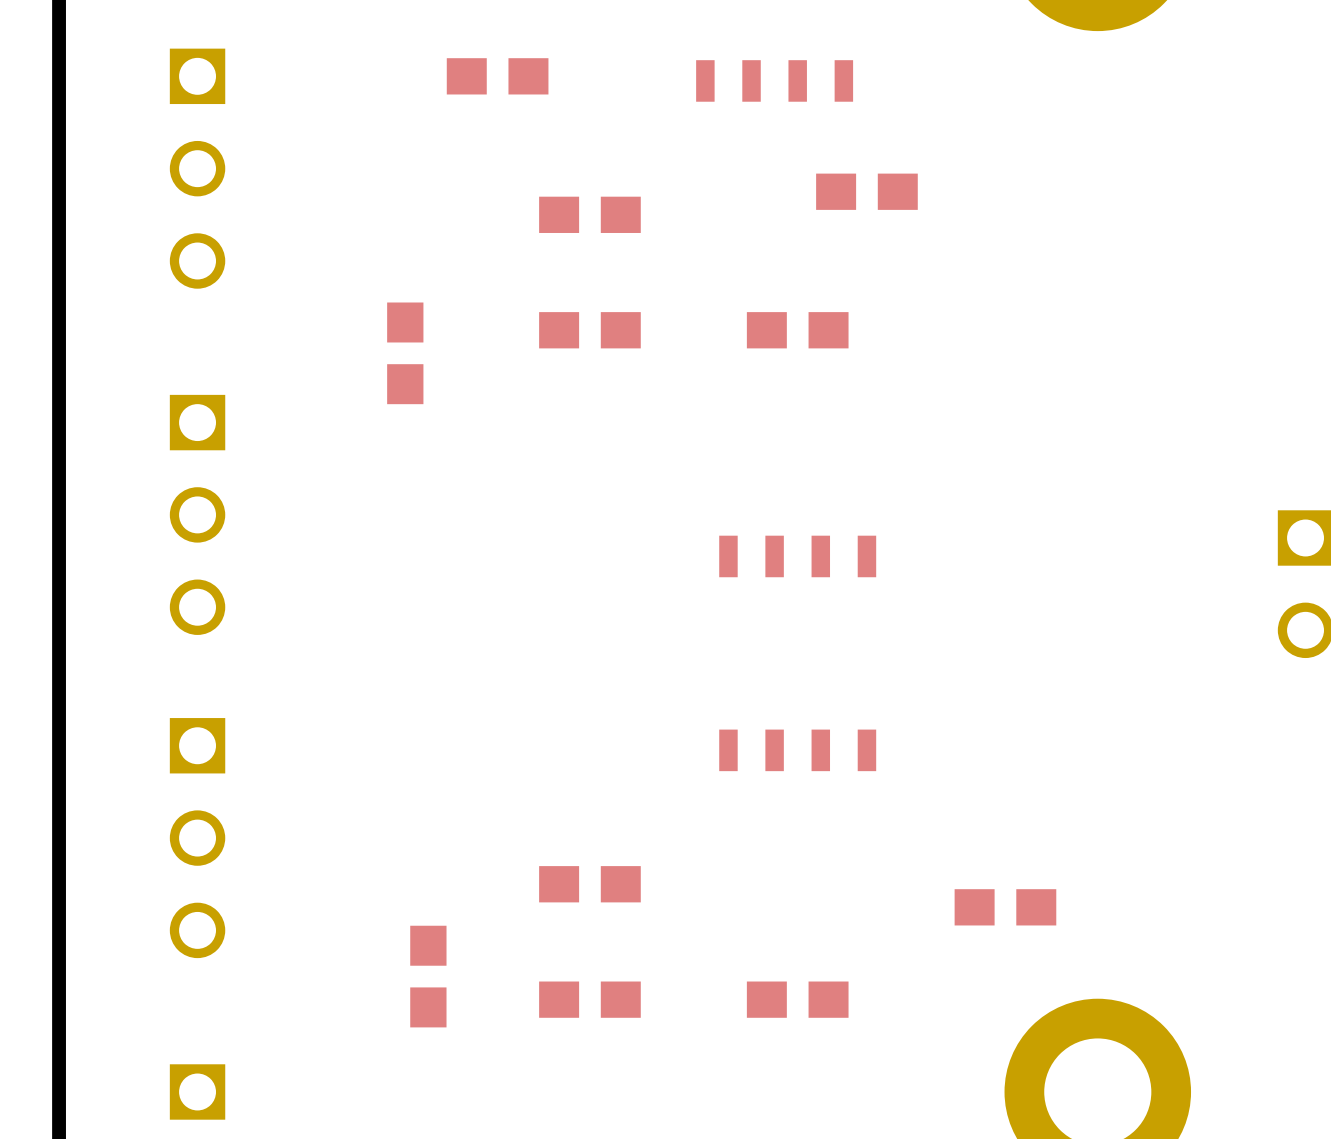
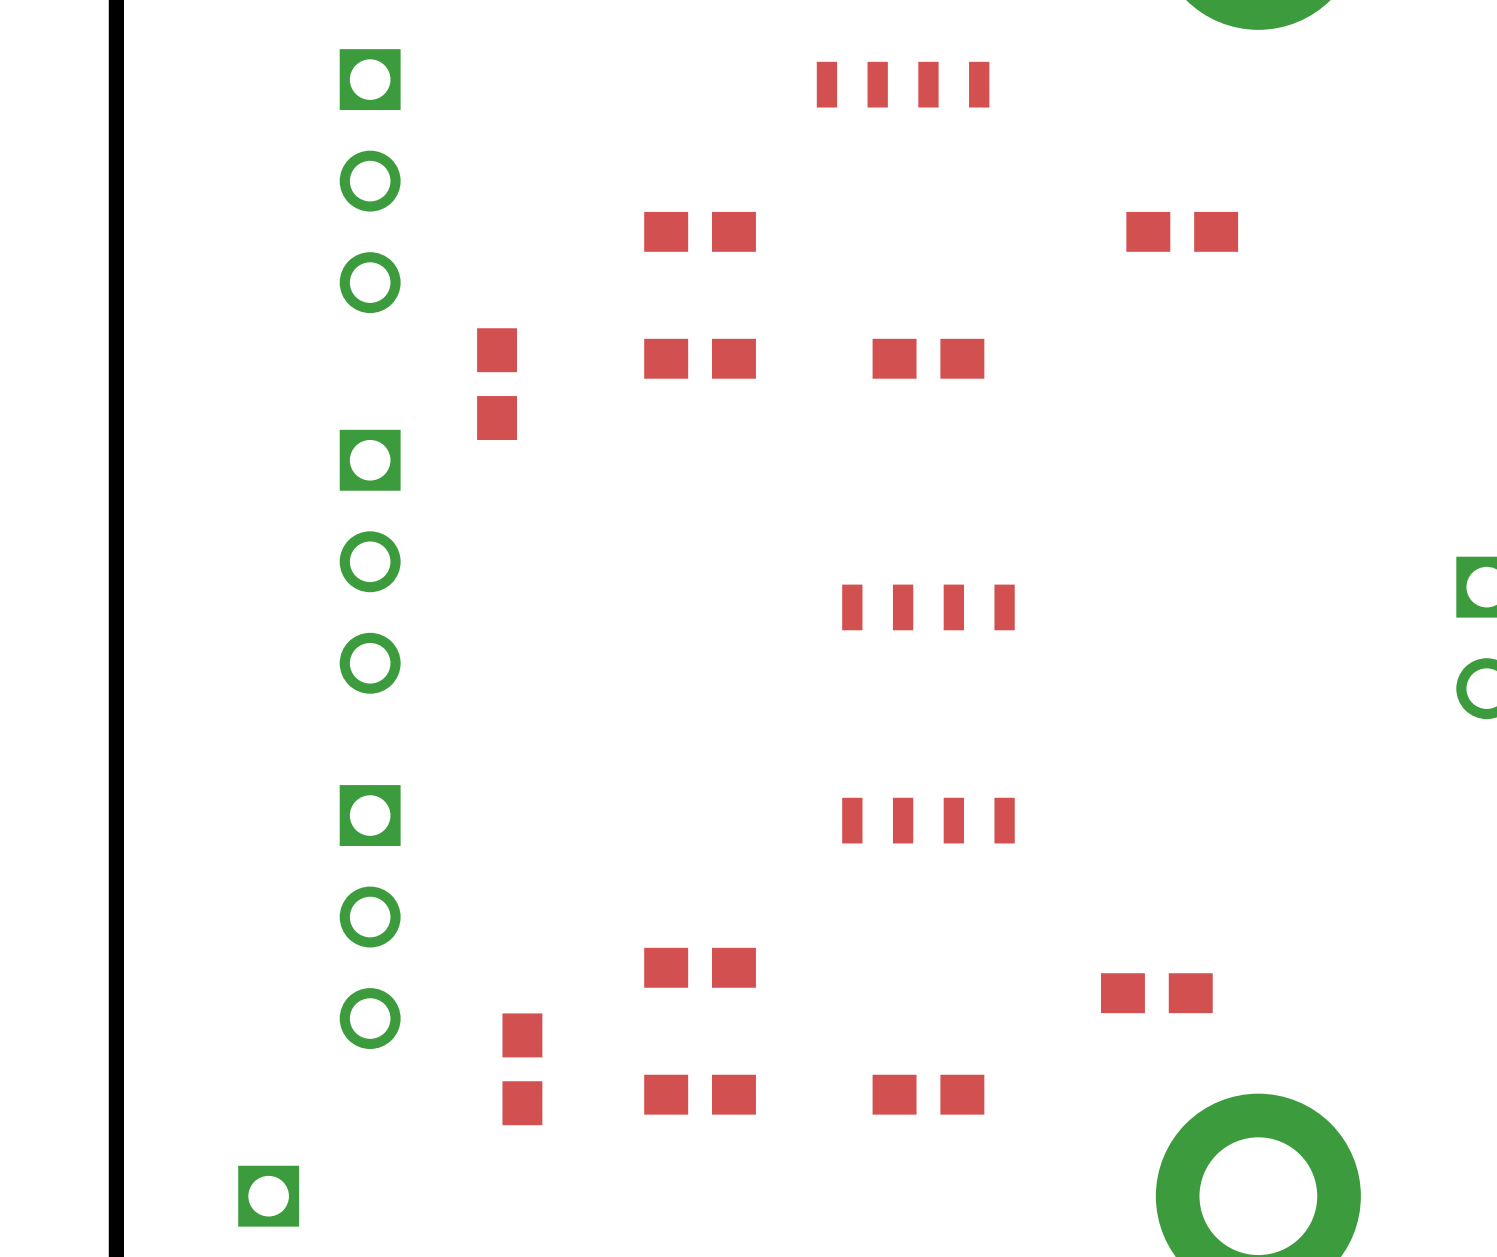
part: (497, 76) -> none
part position: (197, 168) -> (370, 181)
part position: (866, 191) -> (1182, 231)
part position: (197, 514) -> (370, 561)
part position: (197, 838) -> (370, 917)

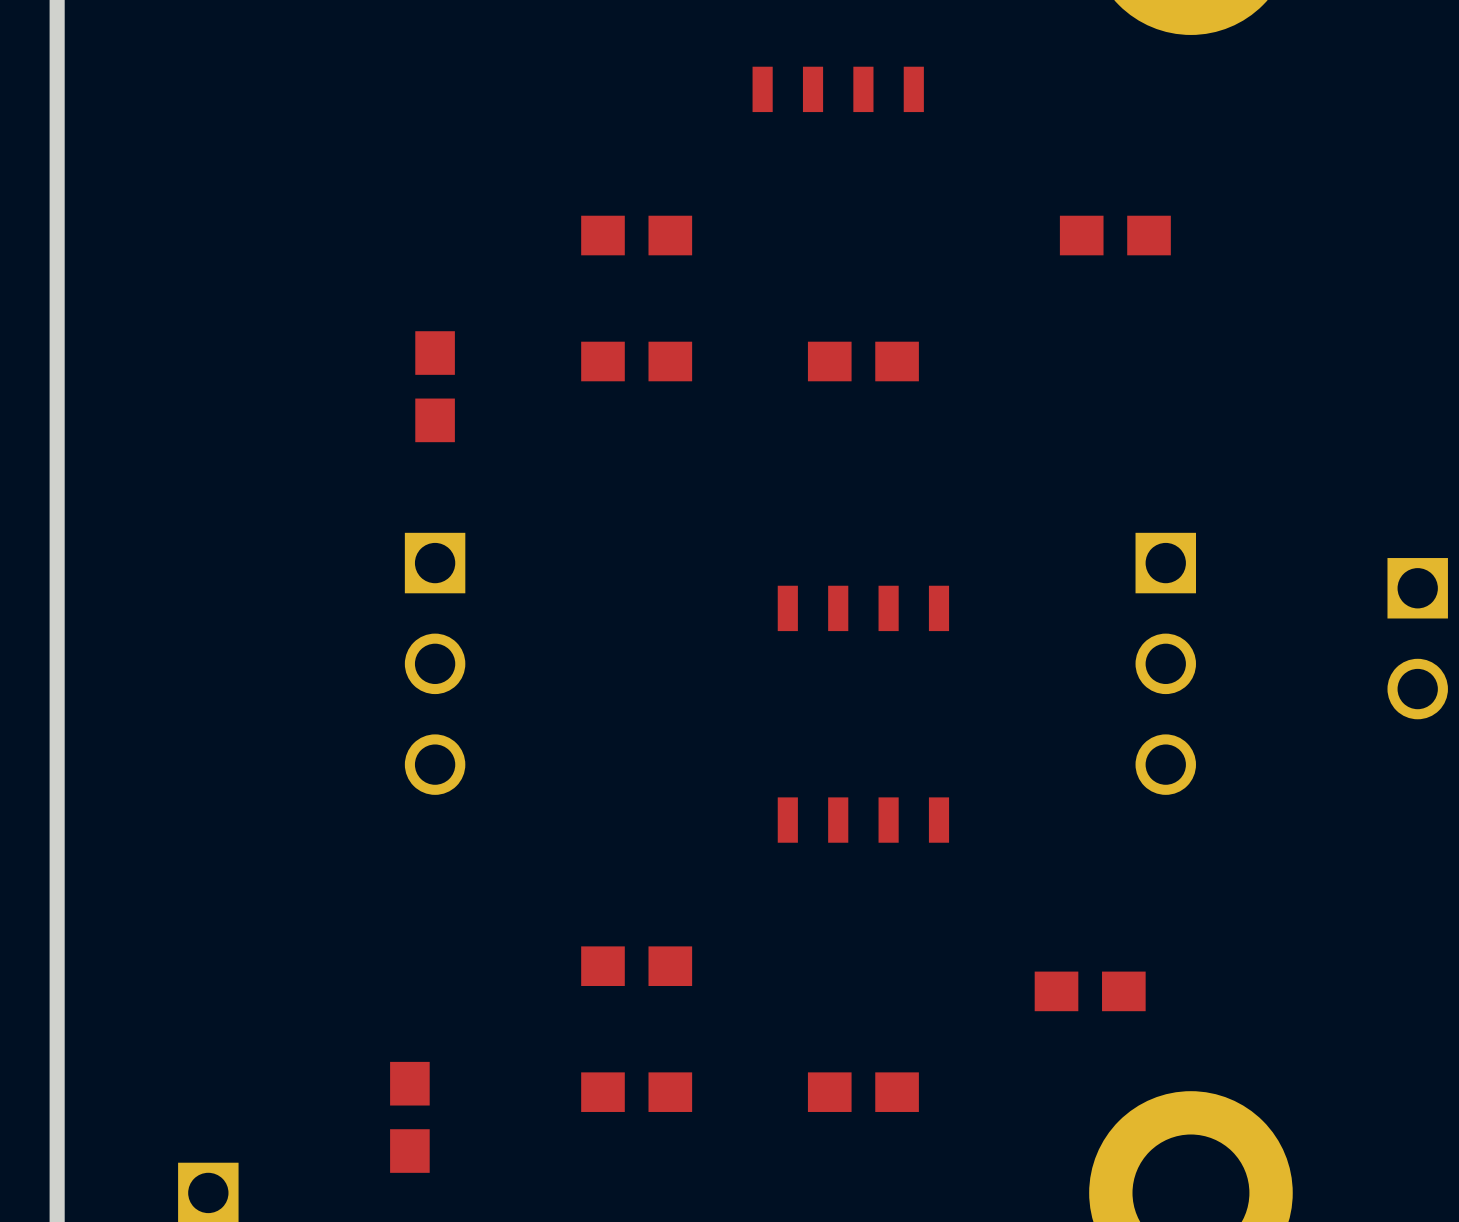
part: (370, 181) -> none
part: (370, 561) -> none
part: none -> (435, 663)
part: none -> (1165, 663)
part: (370, 917) -> none
part position: (522, 1069) -> (409, 1117)

